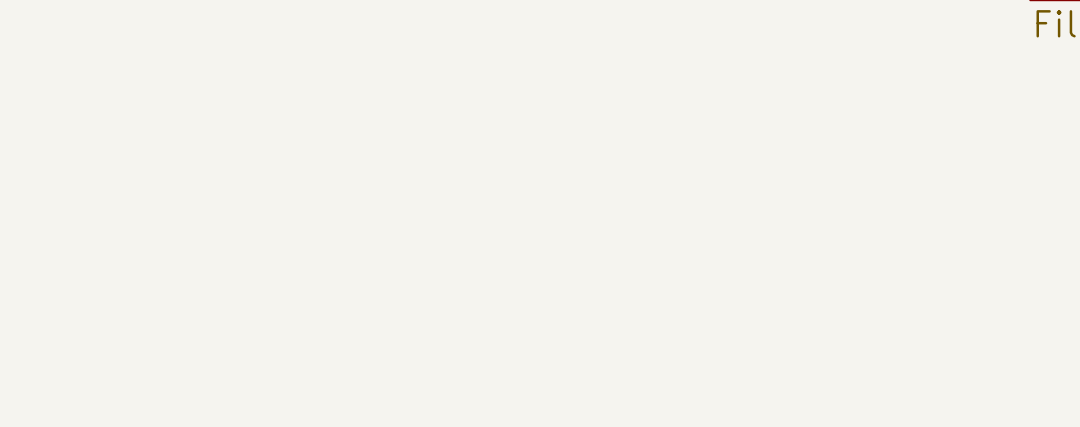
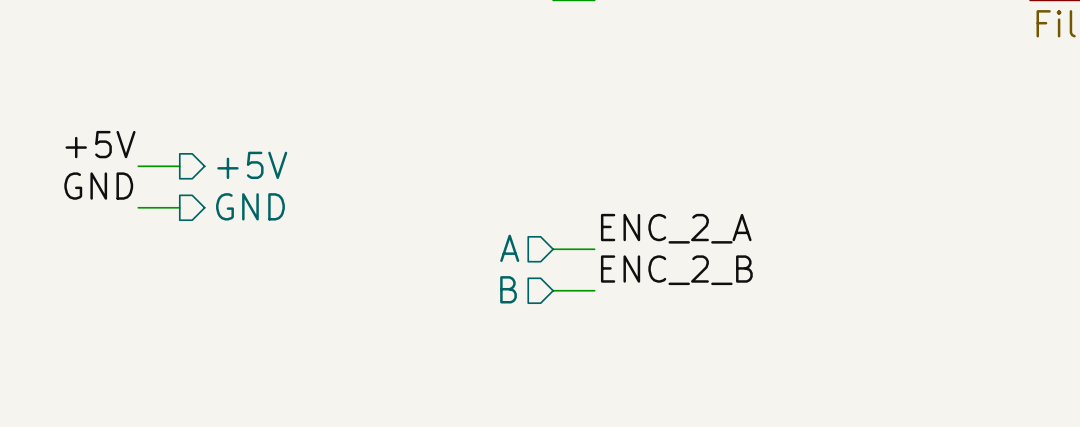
wire: none -> (553, 0) (594, 0)
label: none -> +5V (100, 144)
sheet pin: none -> +5V (252, 165)
wire: none -> (138, 166) (179, 166)
label: none -> GND (98, 186)
sheet pin: none -> GND (250, 206)
wire: none -> (138, 207) (179, 207)
label: none -> ENC_2_A (676, 228)
sheet pin: none -> A (509, 248)
wire: none -> (553, 249) (594, 249)
label: none -> ENC_2_B (676, 270)
sheet pin: none -> B (508, 289)
wire: none -> (553, 290) (594, 290)

